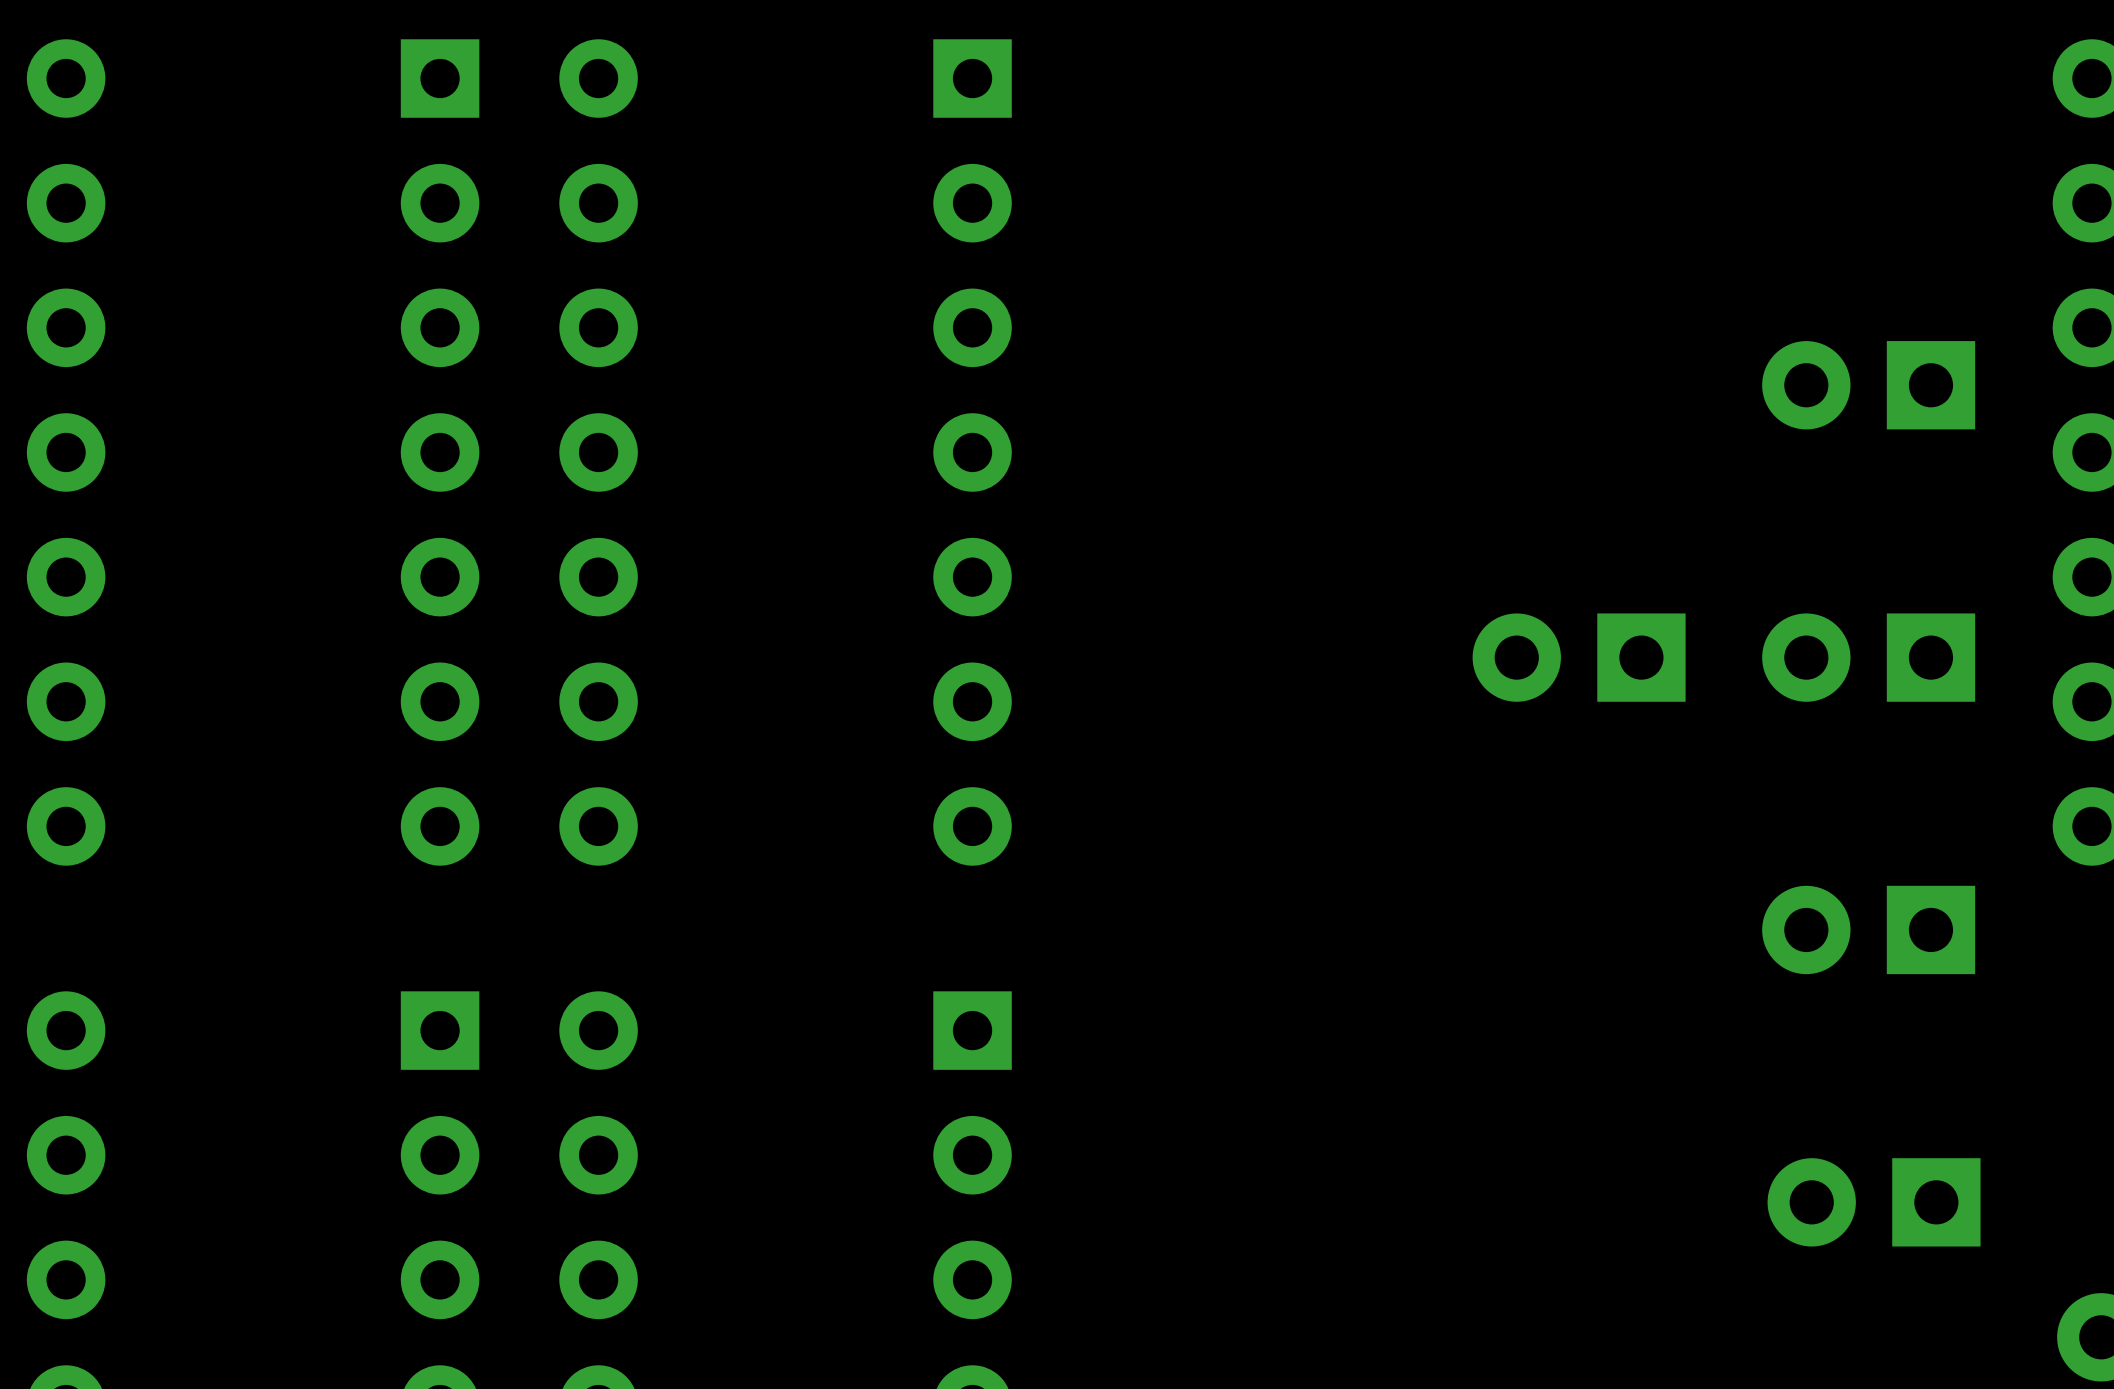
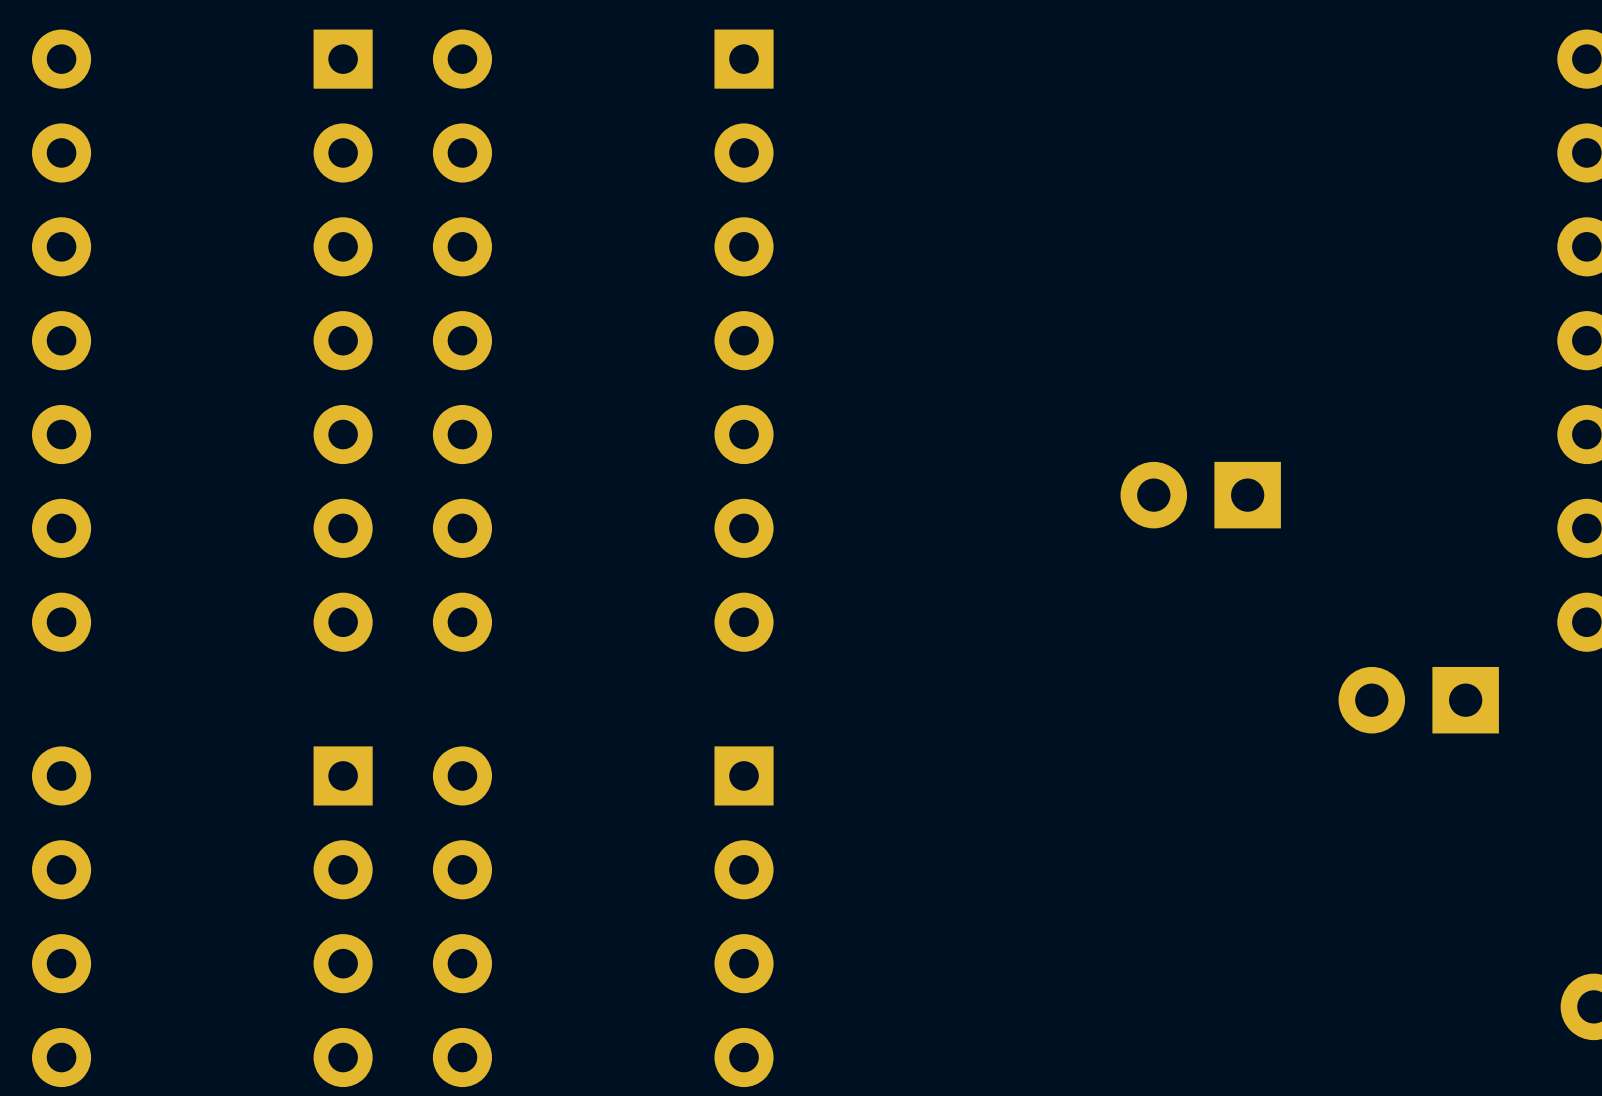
part: (1868, 385) -> none
part: (1868, 657) -> none
part: (1874, 1202) -> none

